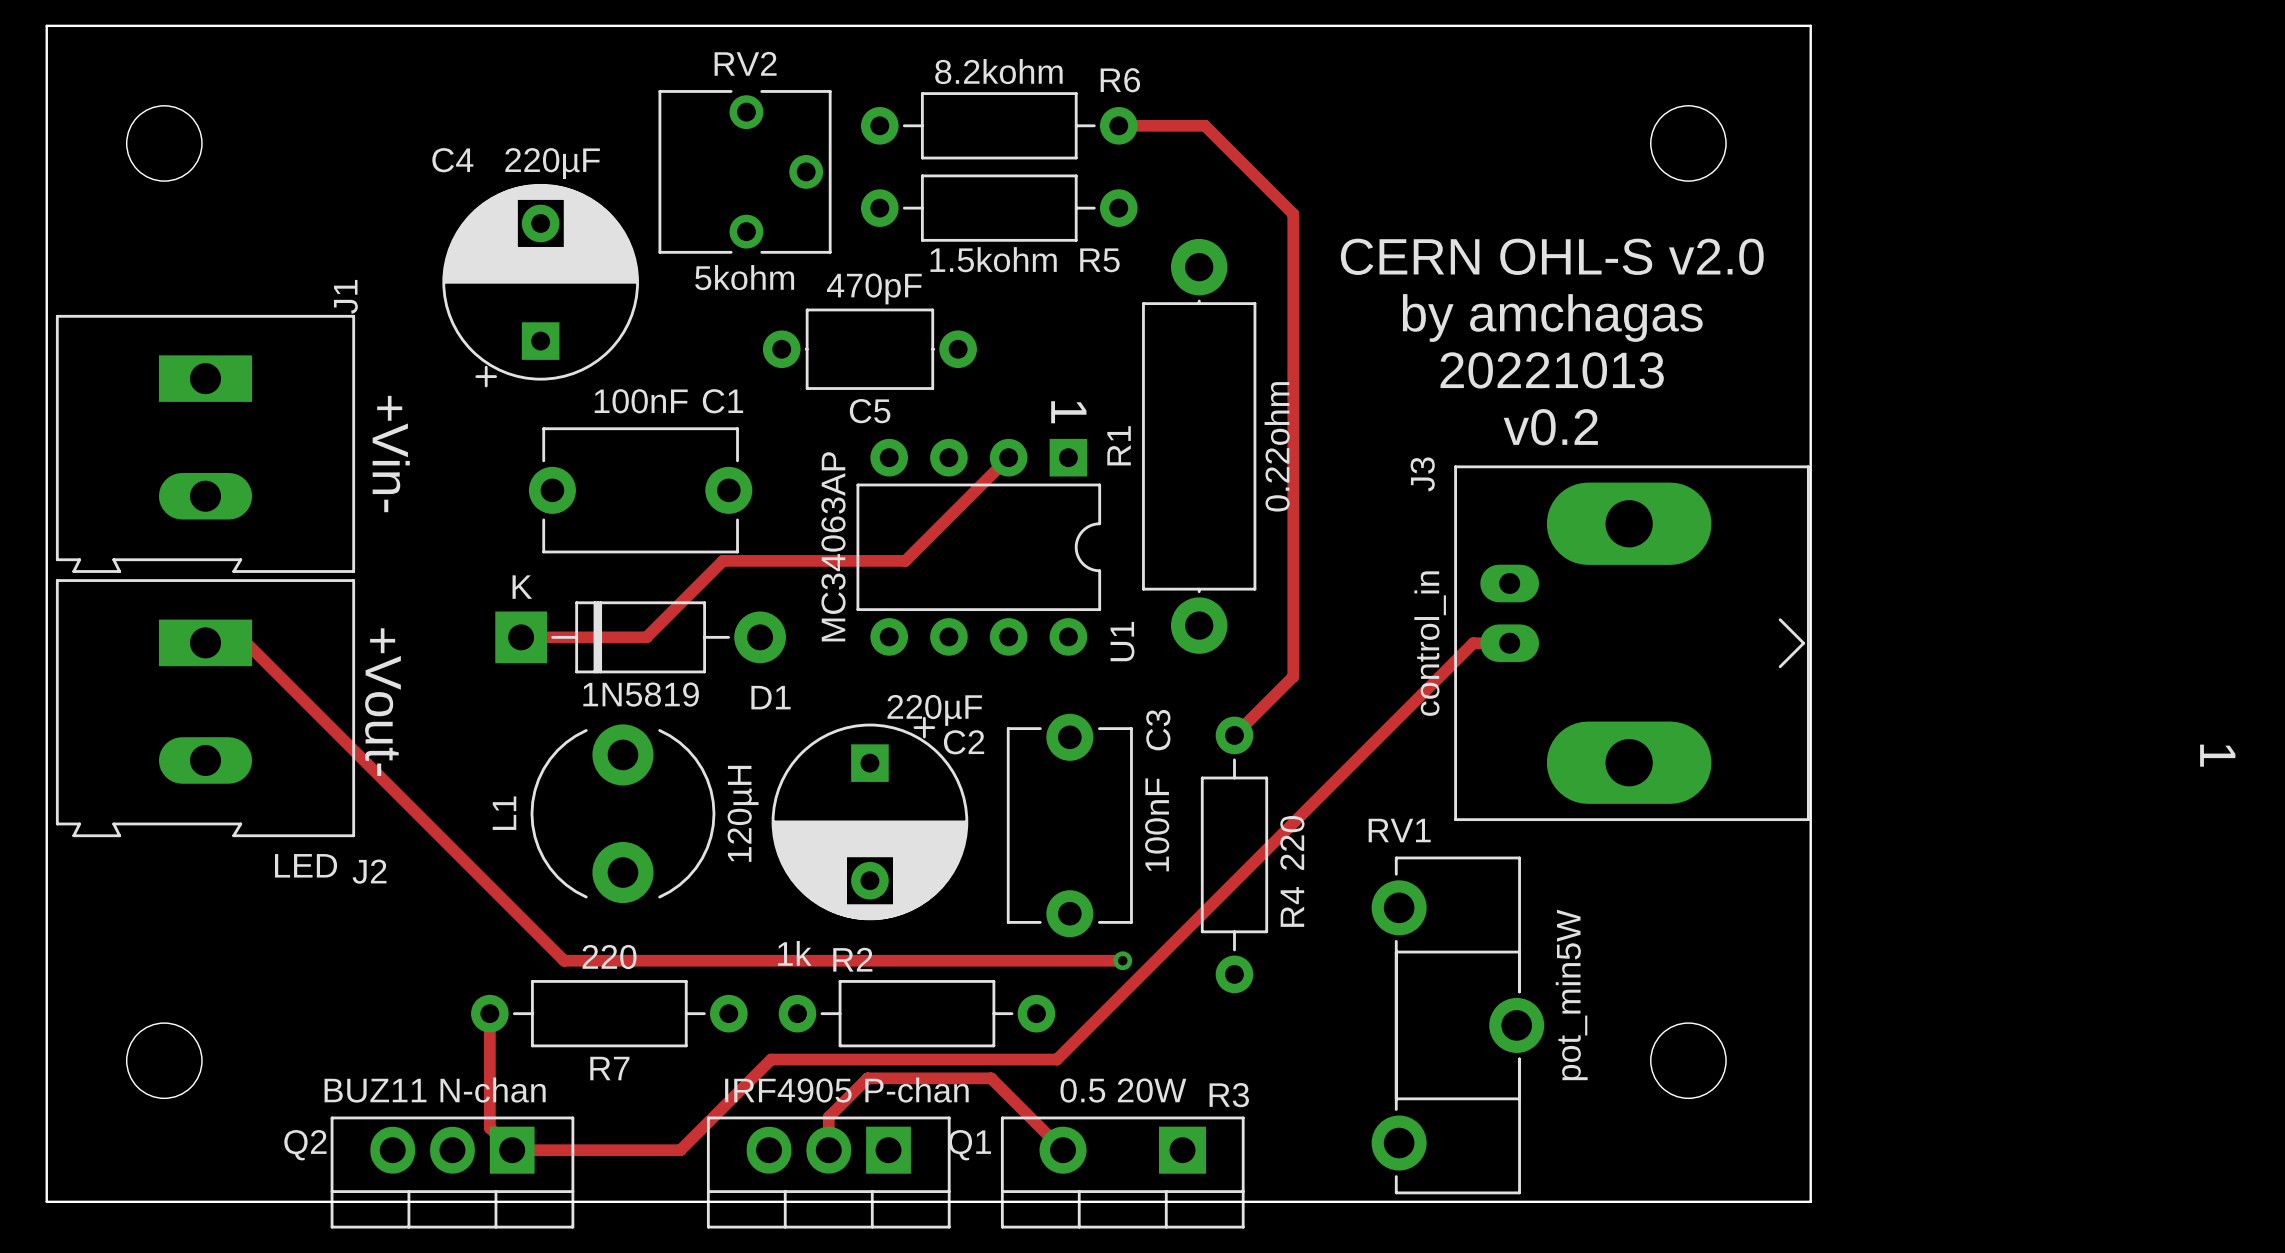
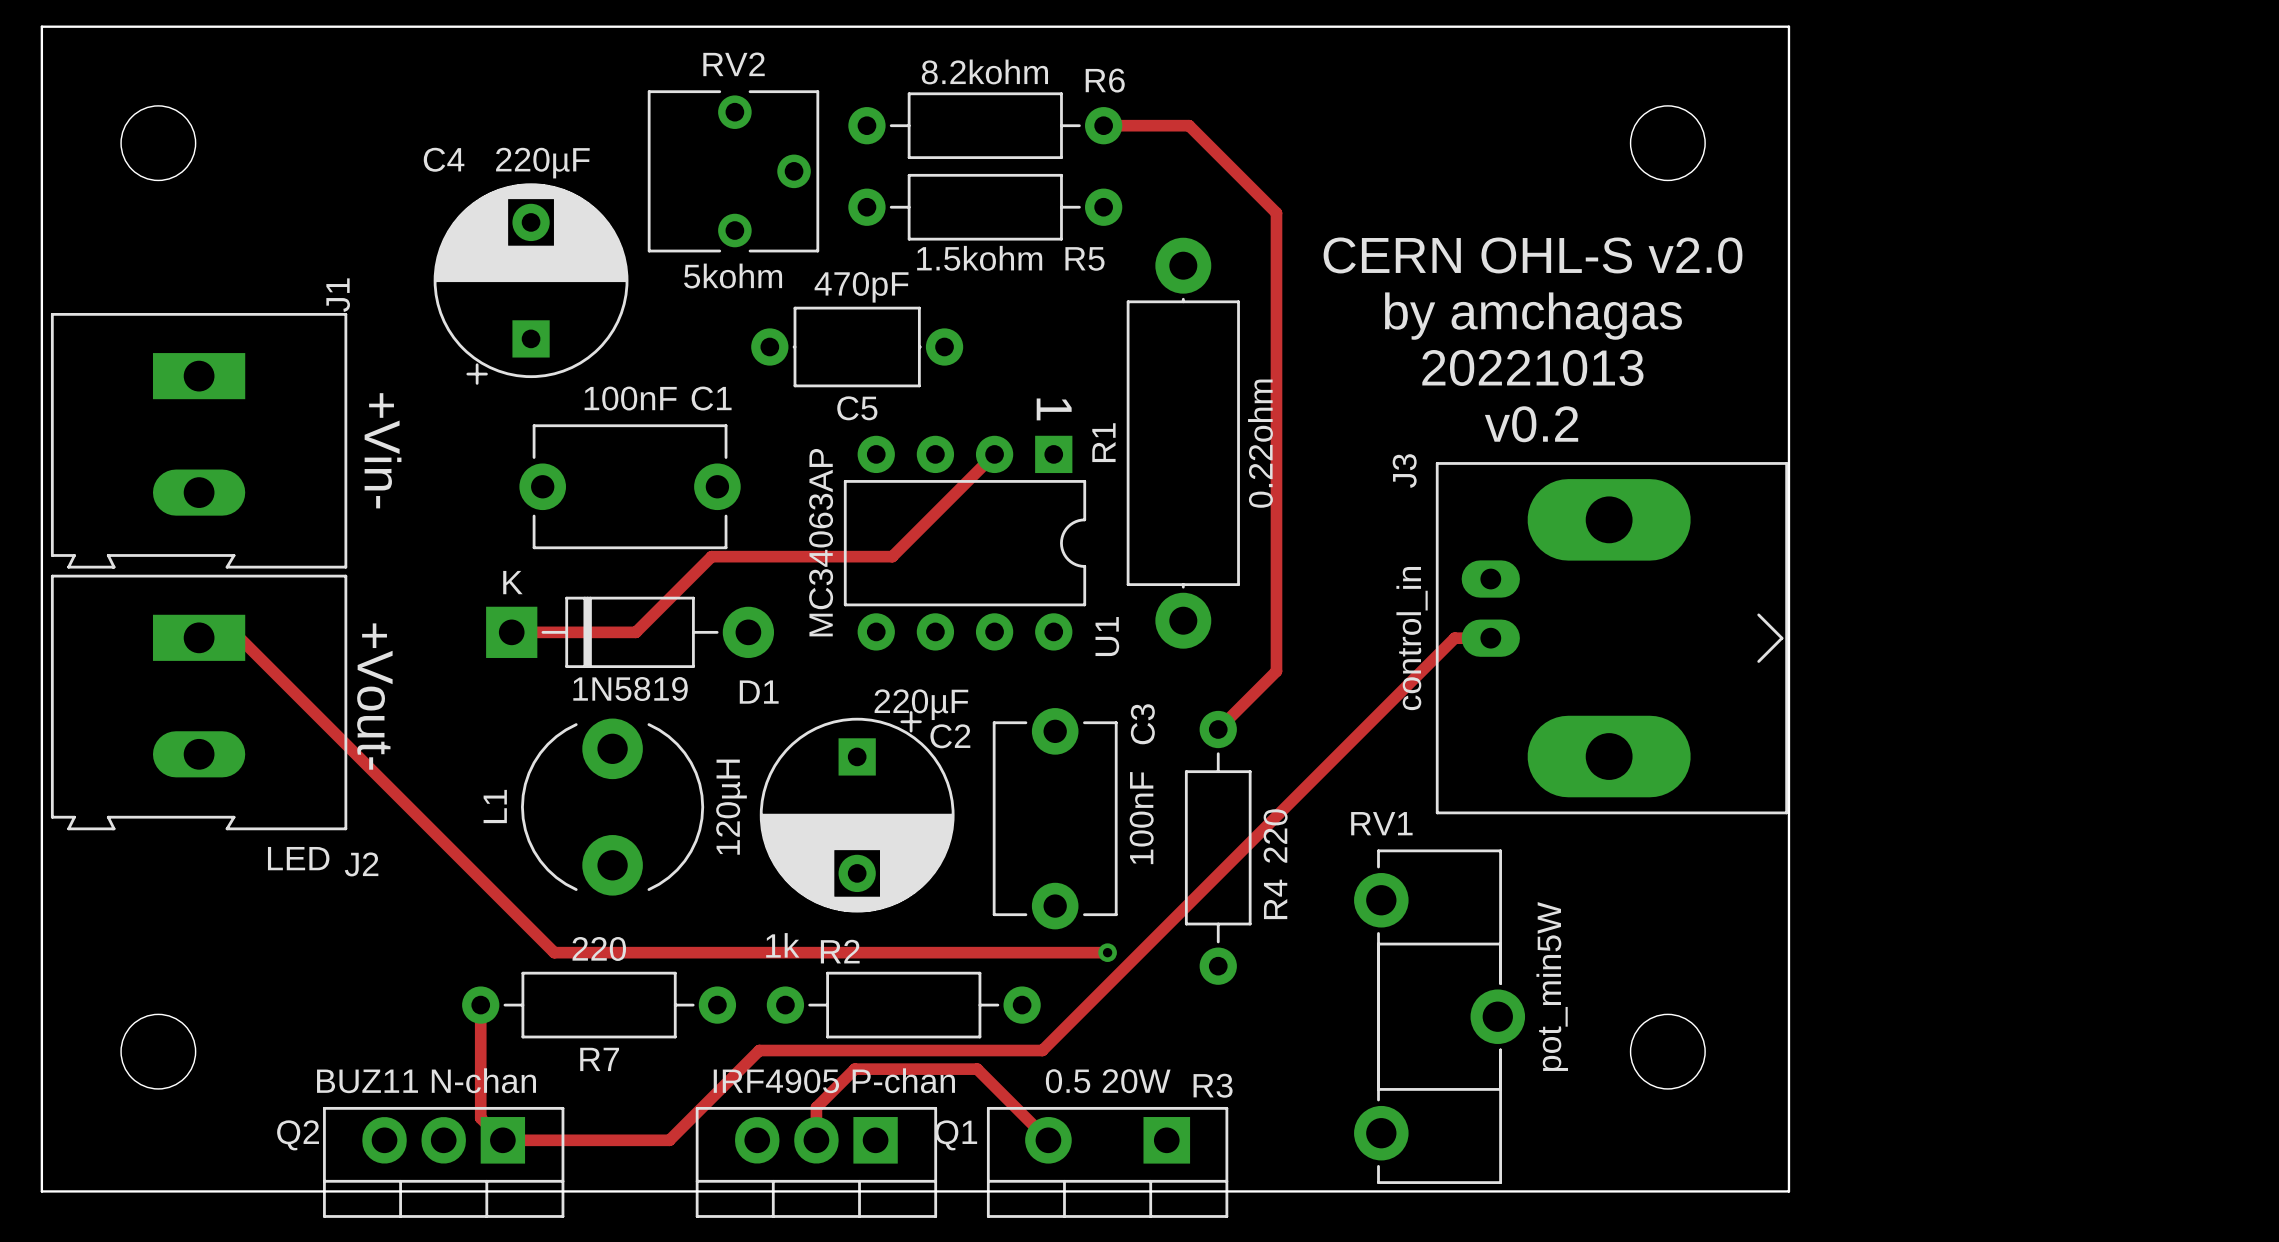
text: 1 (2217, 755) -> none

